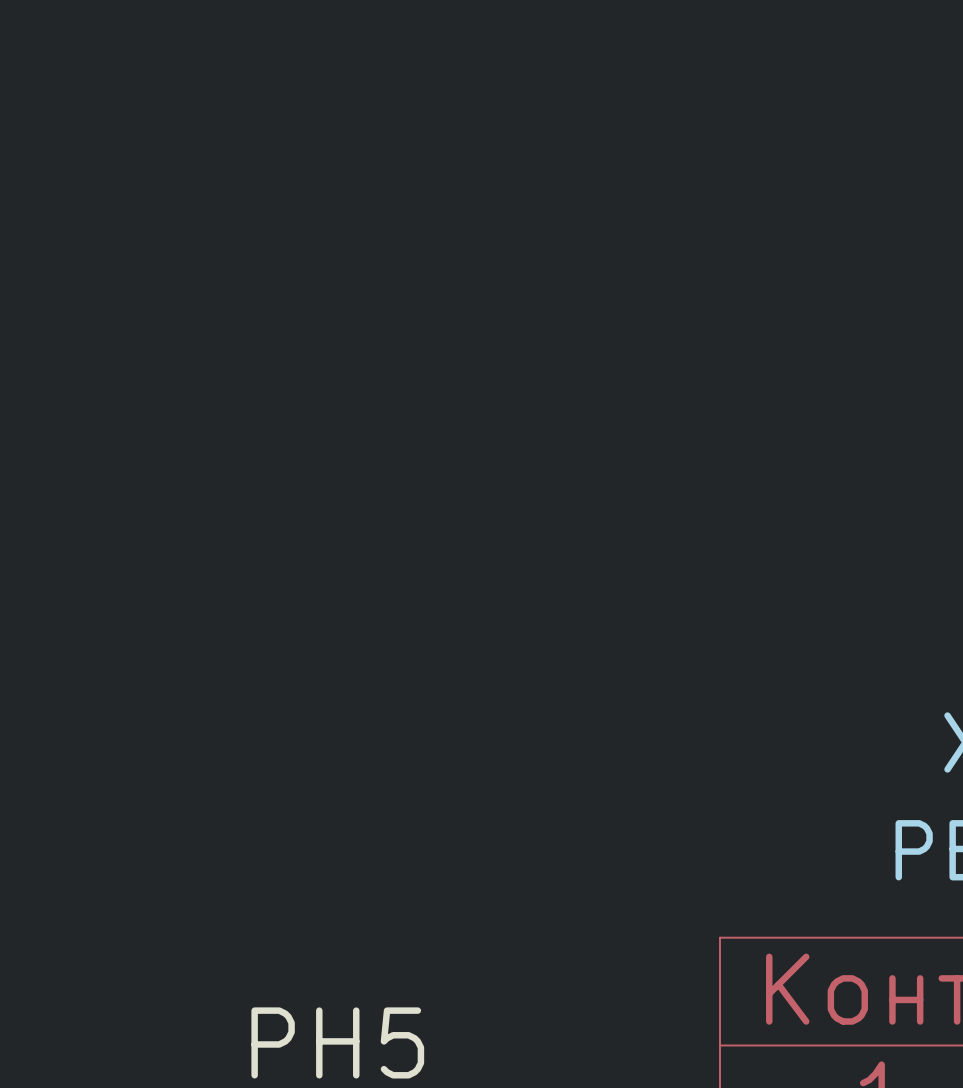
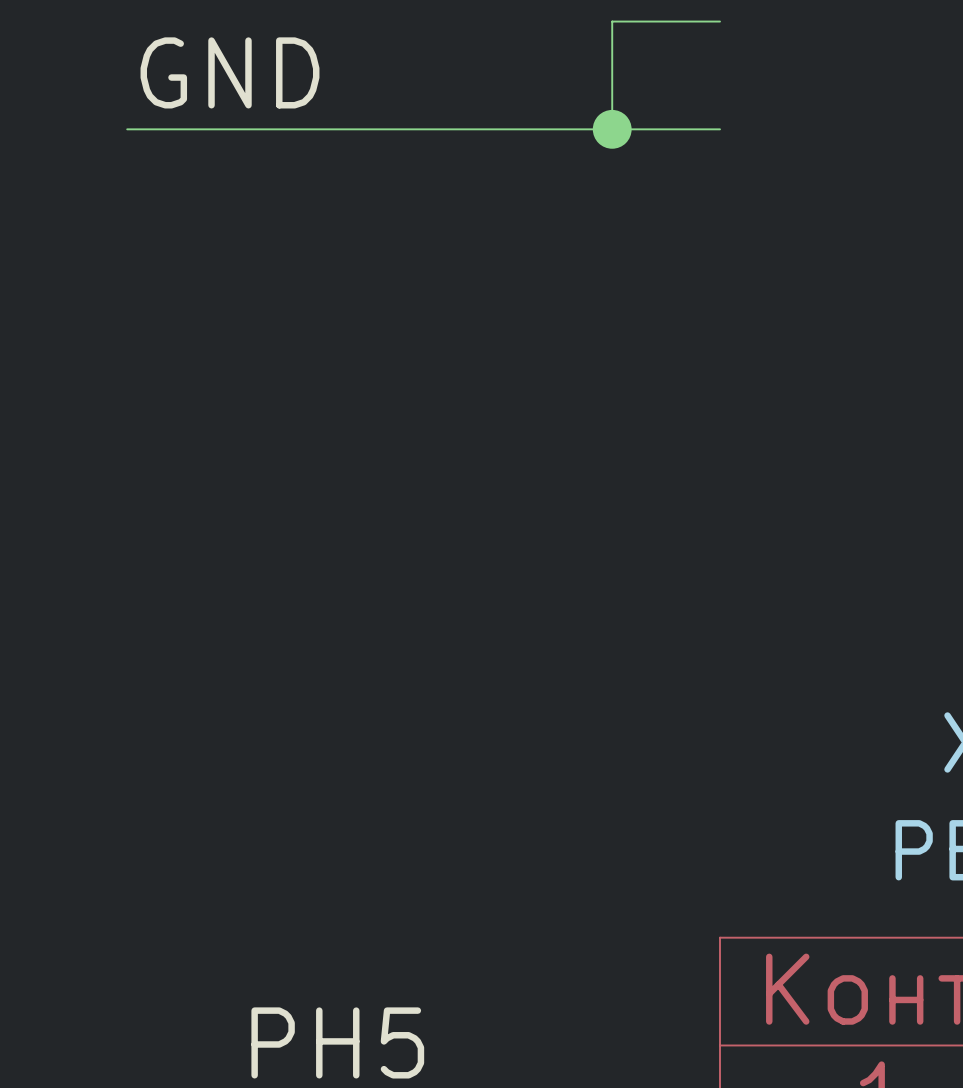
wire: none -> (720, 21) (612, 21) (612, 129)
label: none -> GND (230, 72)
wire: none -> (127, 129) (720, 129)
junction: none -> (612, 129)

